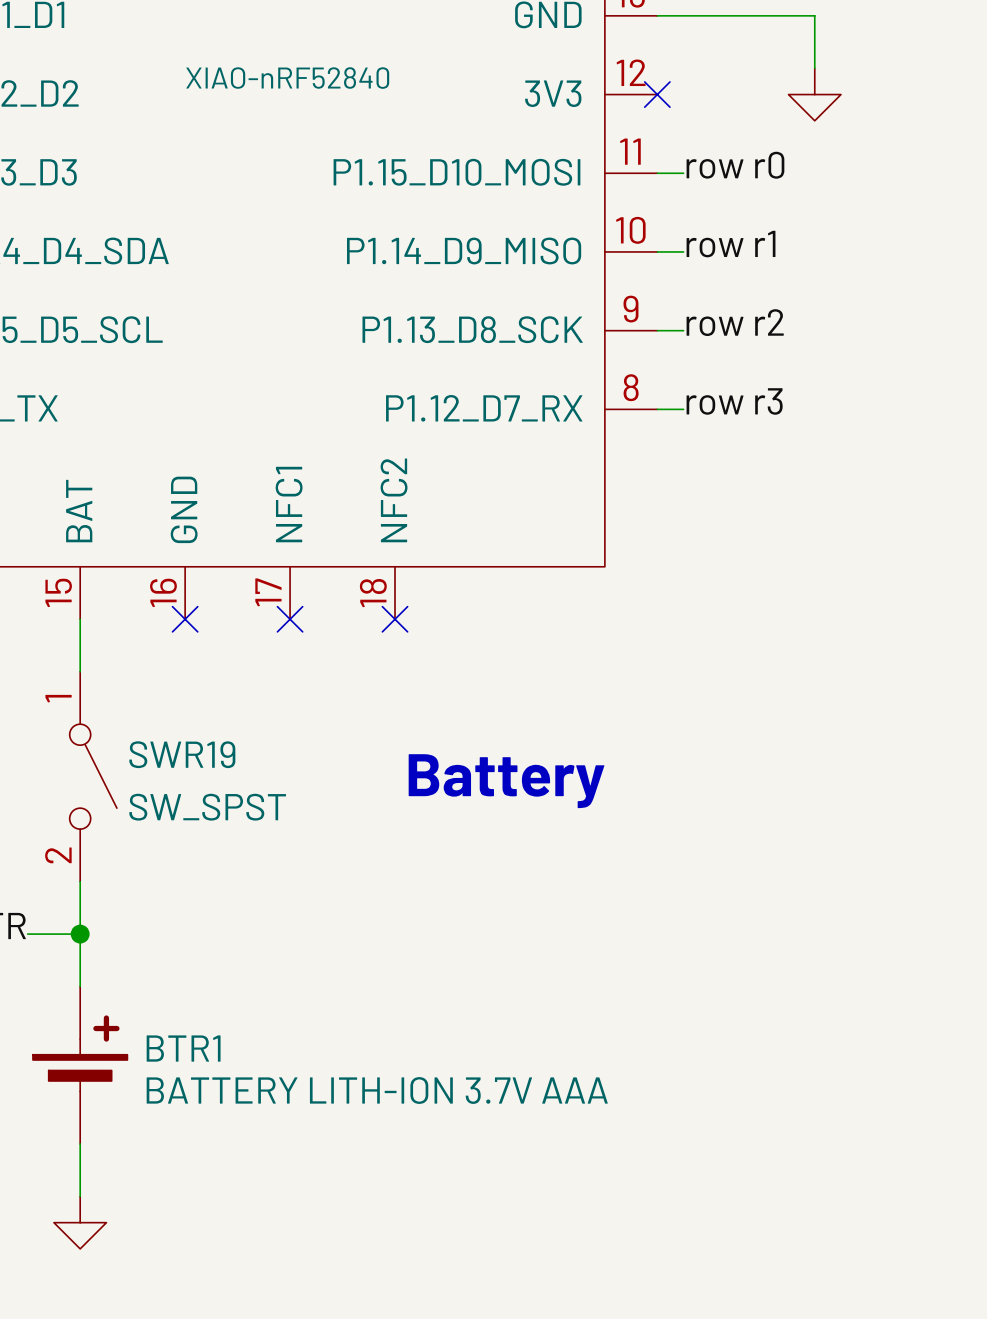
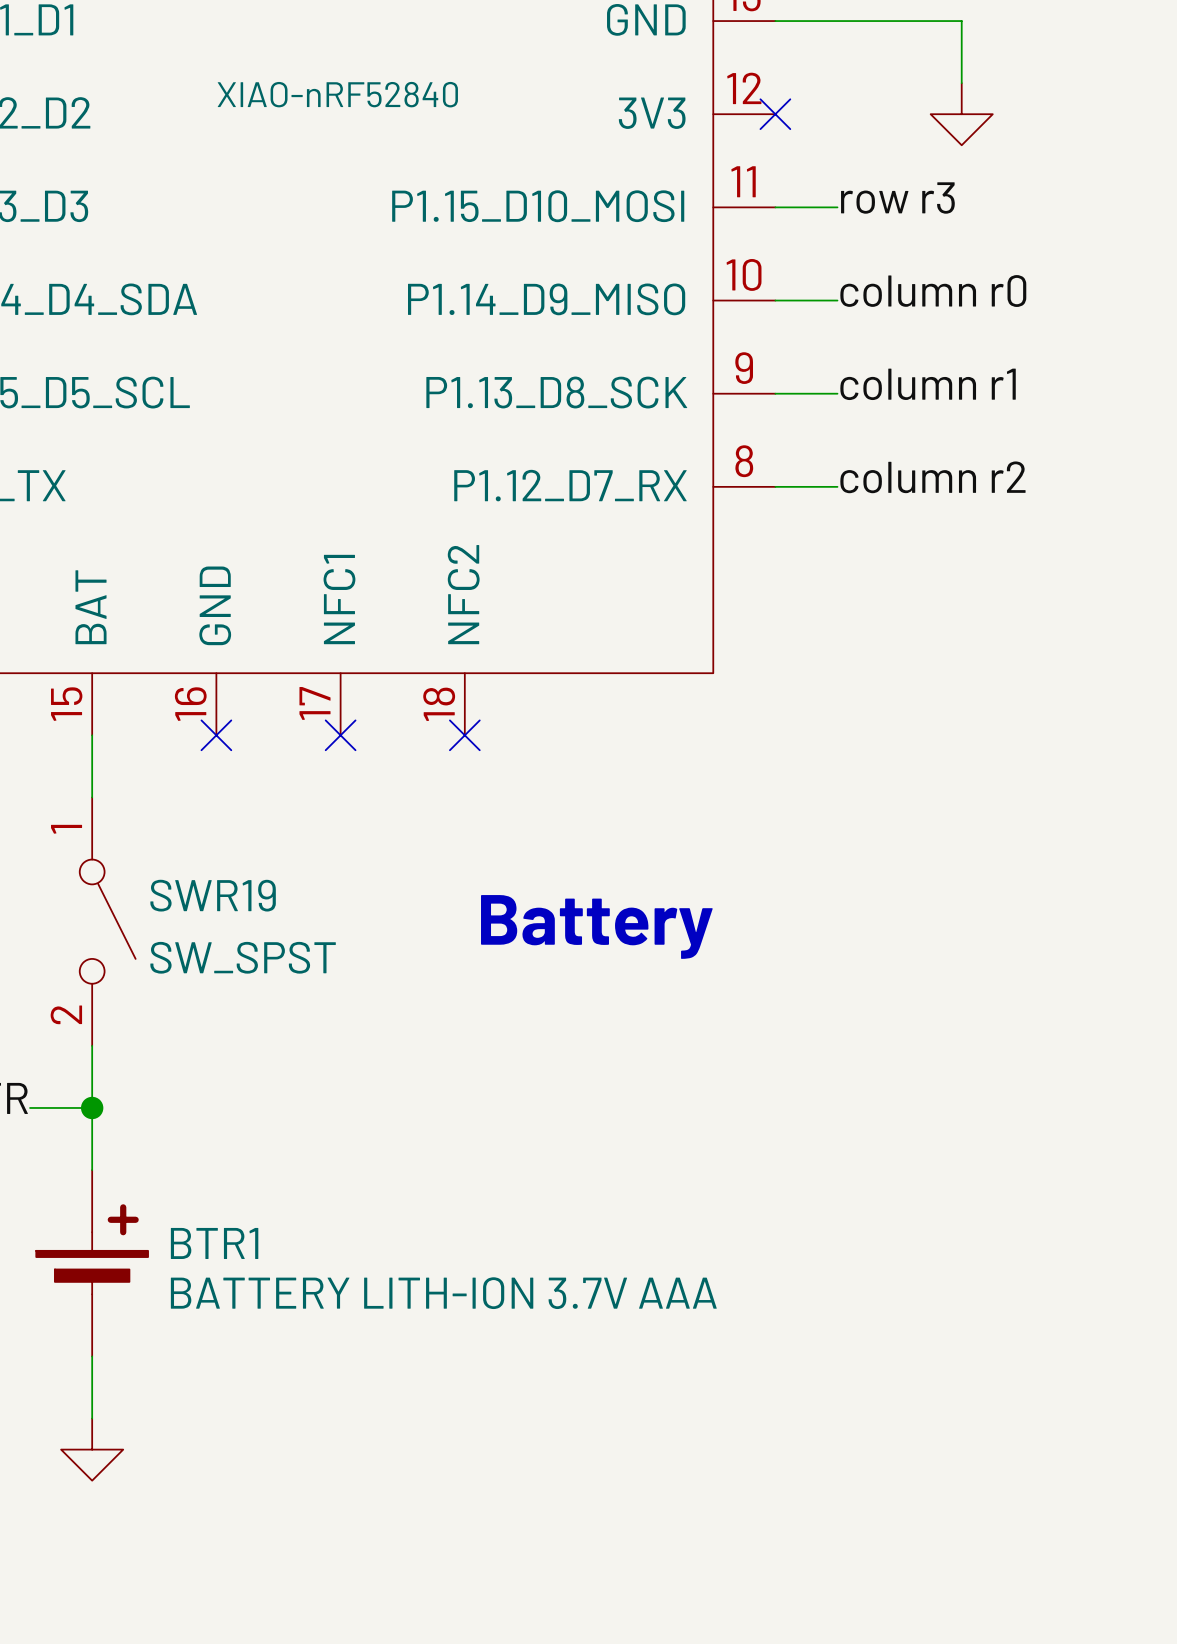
label: row r0 (735, 165) -> none
wire: none -> (806, 207) (837, 207)
label: none -> column r0 (933, 291)
label: row r1 (731, 244) -> none
wire: none -> (806, 300) (837, 300)
label: row r2 (735, 322) -> none
label: none -> column r1 (928, 384)
wire: none -> (806, 393) (837, 393)
label position: row r3 (734, 401) -> row r3 (897, 198)
label: none -> column r2 (932, 477)
wire: none -> (806, 486) (837, 486)

